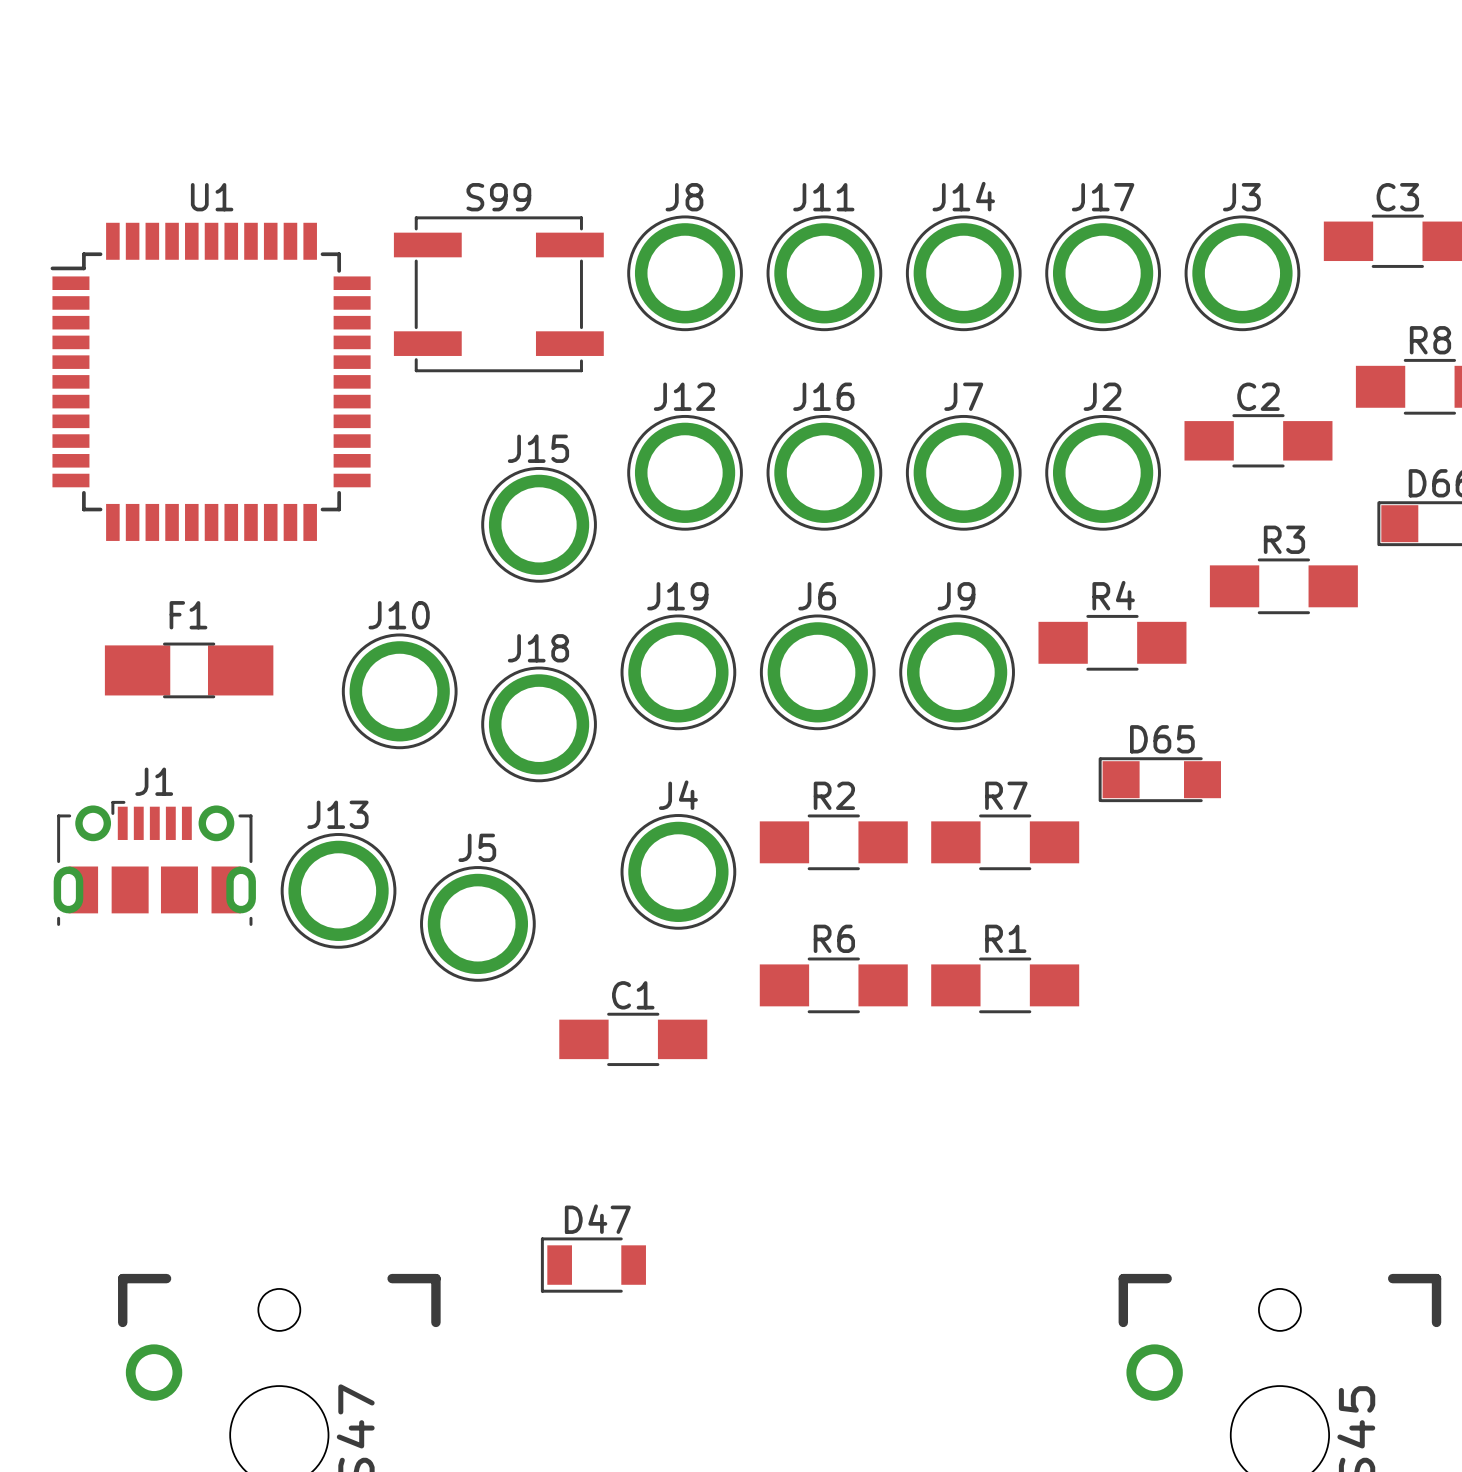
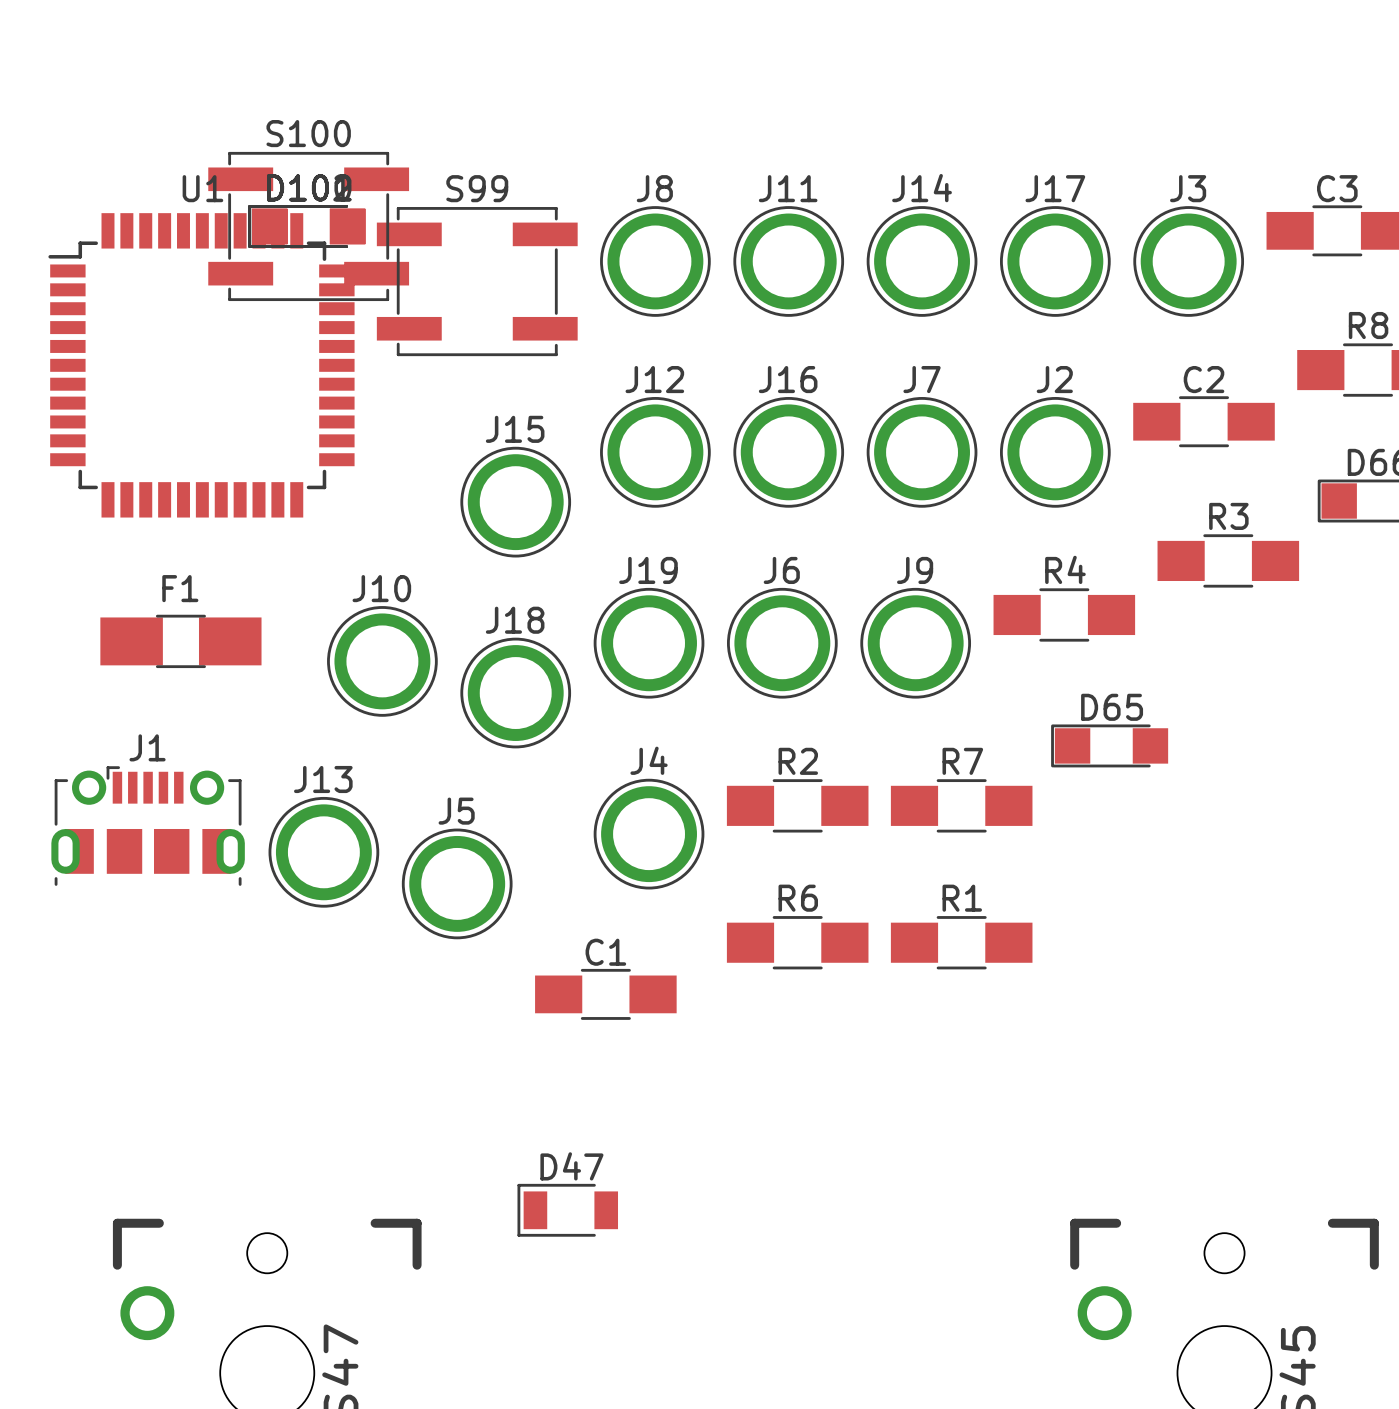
part: none -> (306, 226)
part: none -> (306, 226)
part: none -> (306, 226)
S100: none -> (308, 226)

